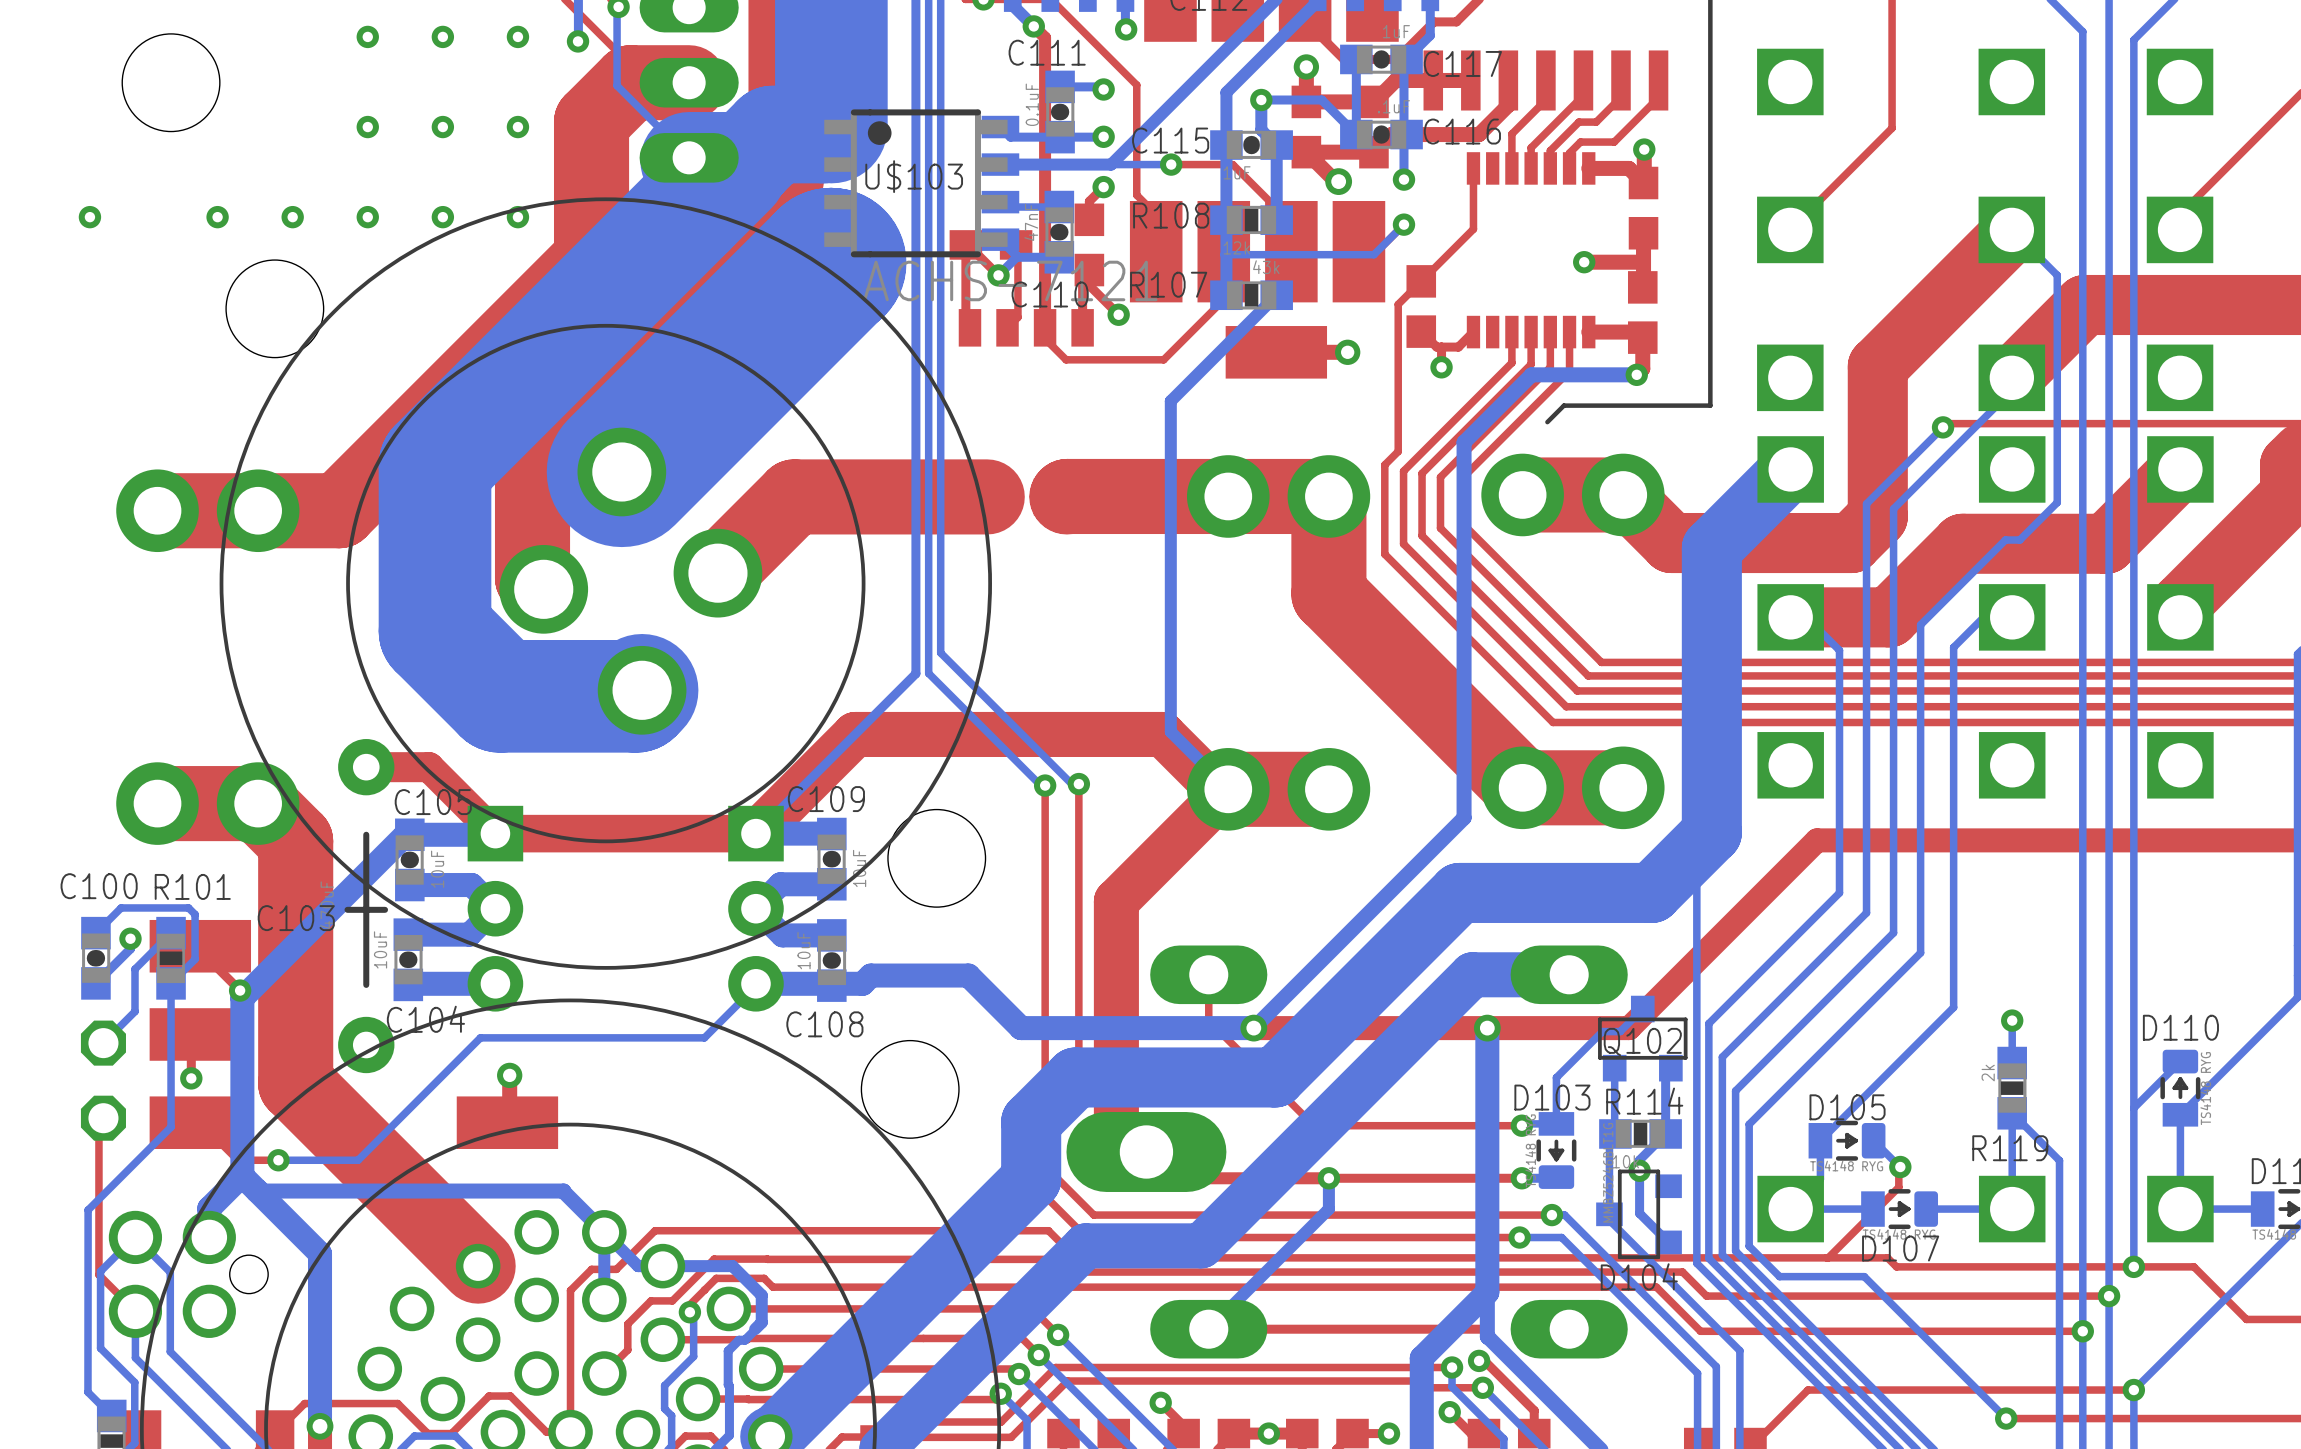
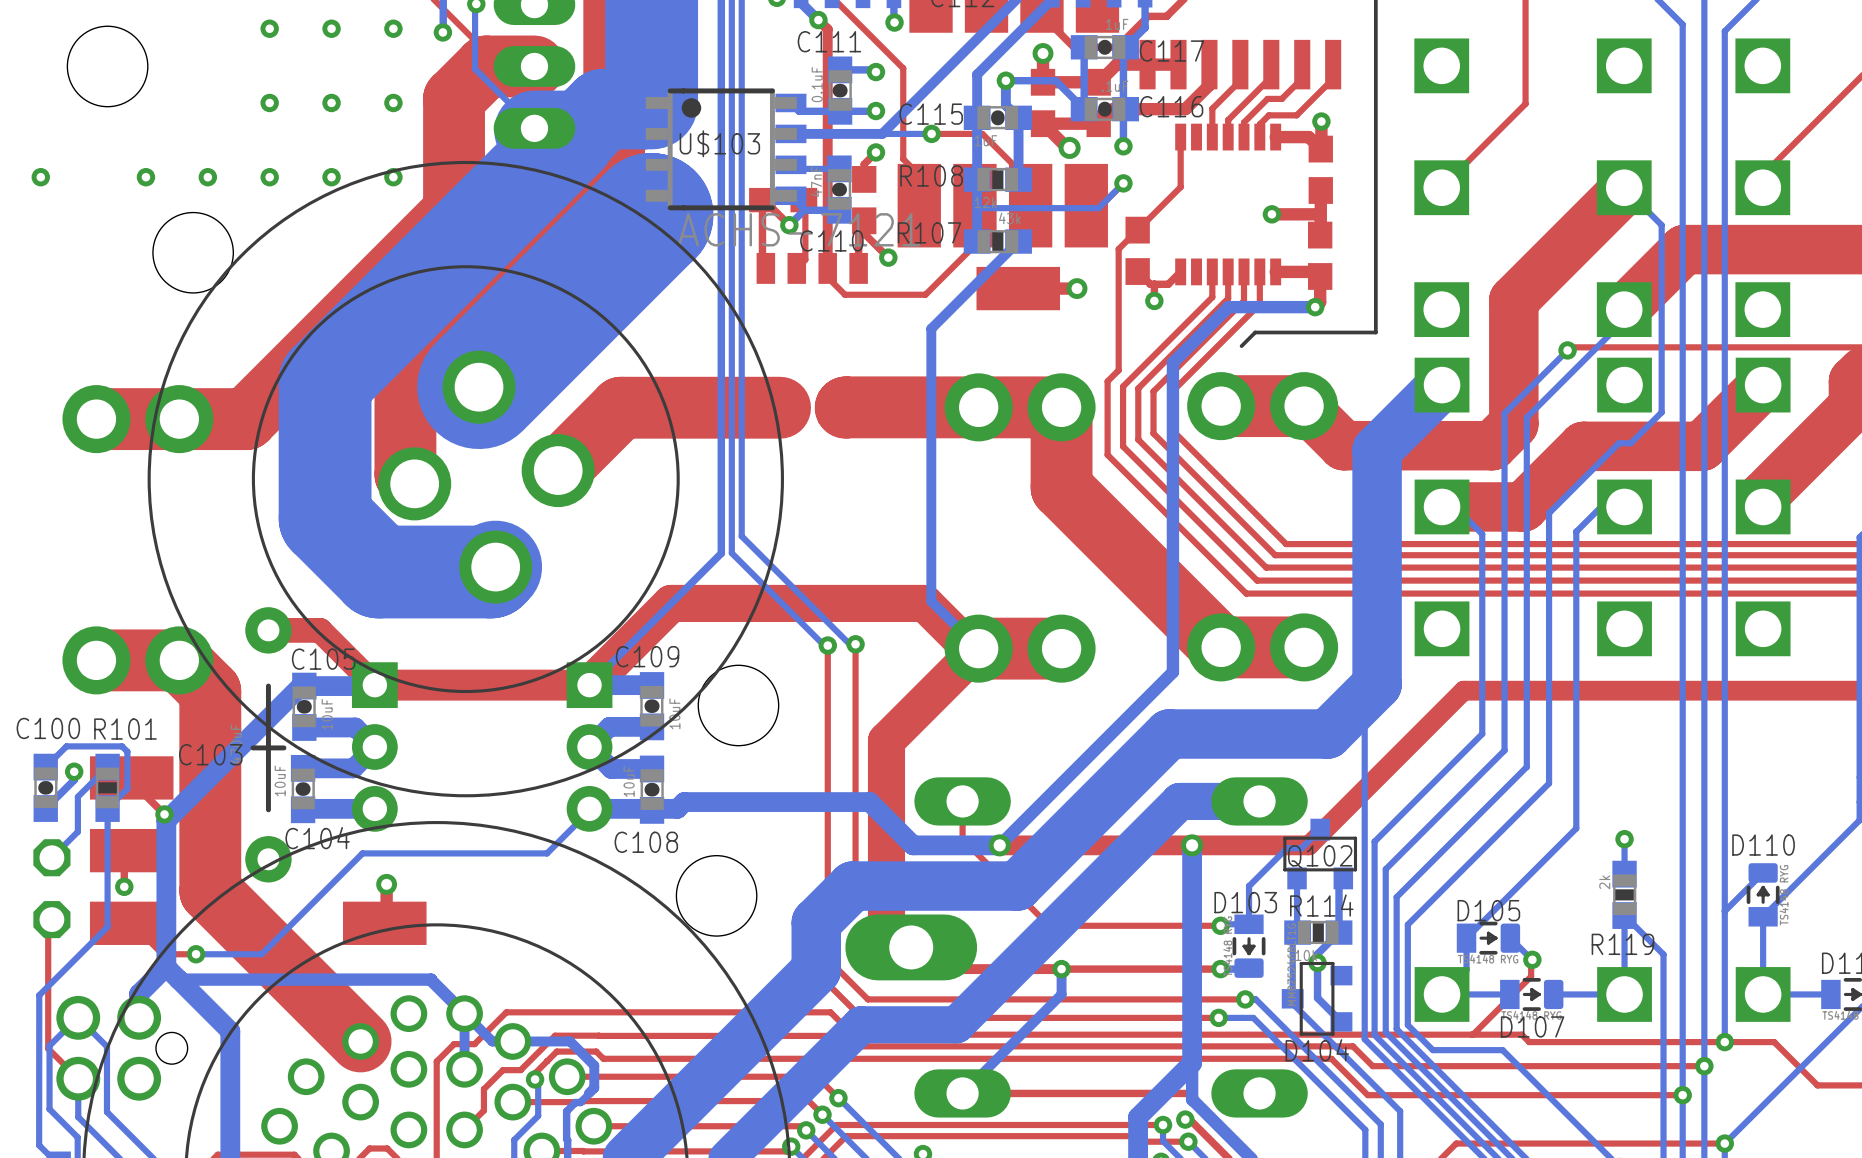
bottom track: (968, 975) (1021, 1028) (1148, 1028) -> (764, 802) (869, 802) (913, 845)

